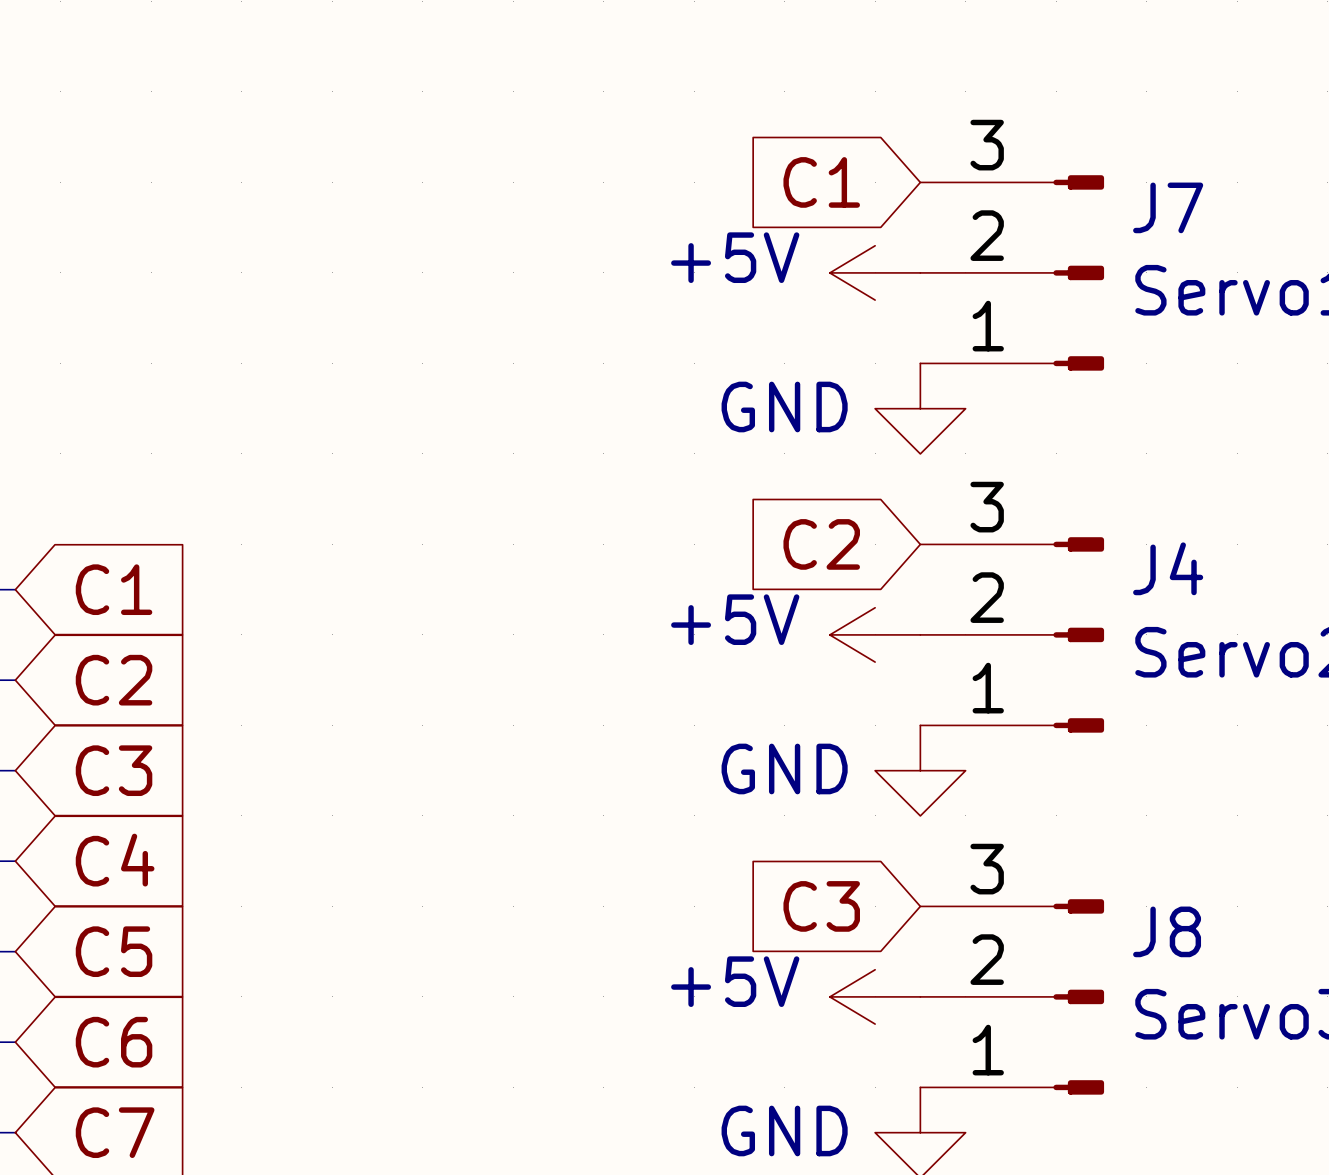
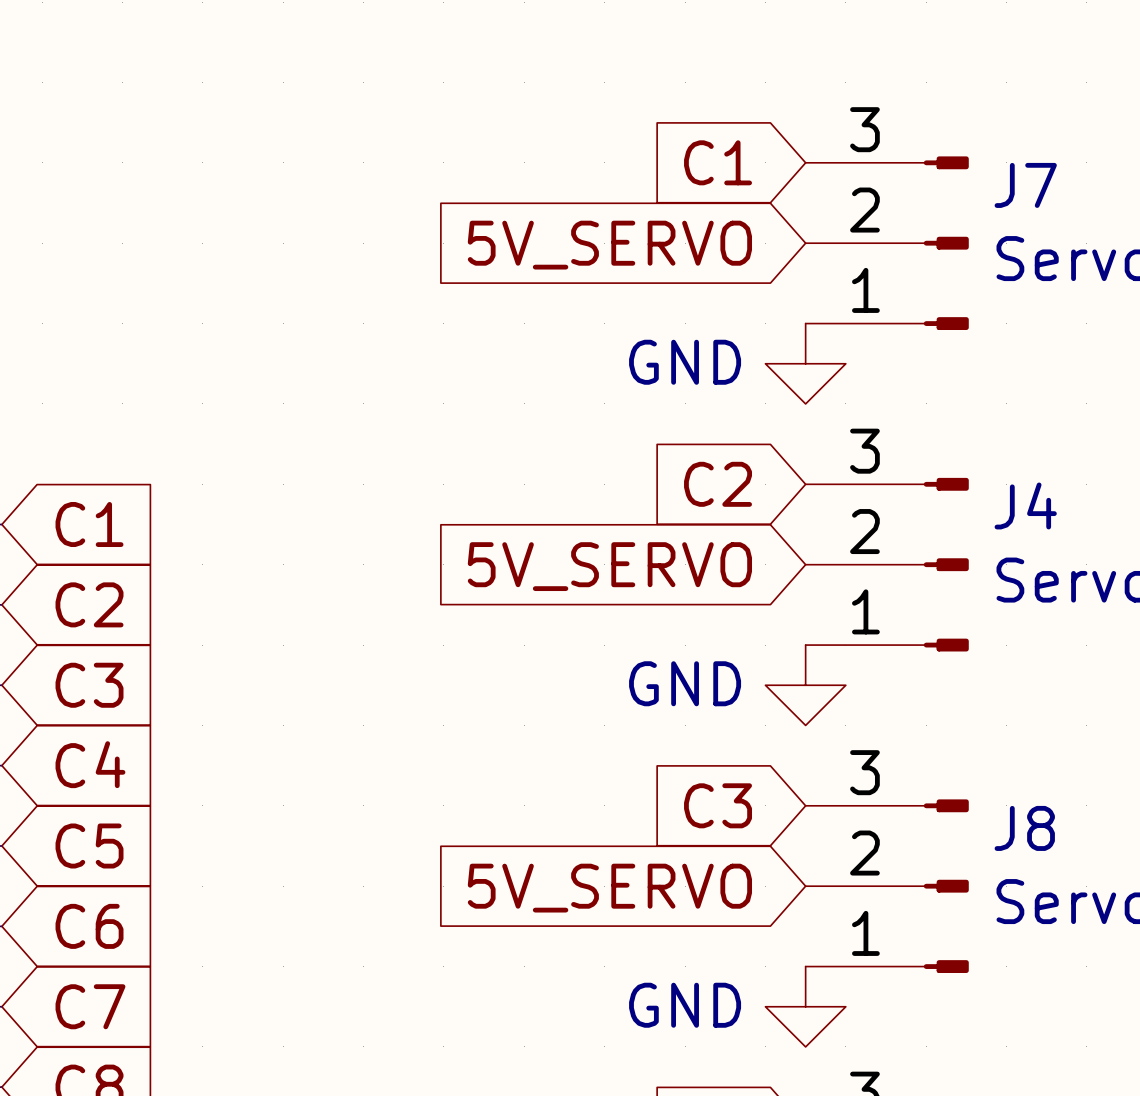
power symbol: +5V (875, 272) -> none
global label: none -> 5V_SERVO (609, 245)
power symbol: +5V (875, 634) -> none
global label: none -> 5V_SERVO (609, 566)
power symbol: +5V (875, 996) -> none
global label: none -> 5V_SERVO (609, 888)

